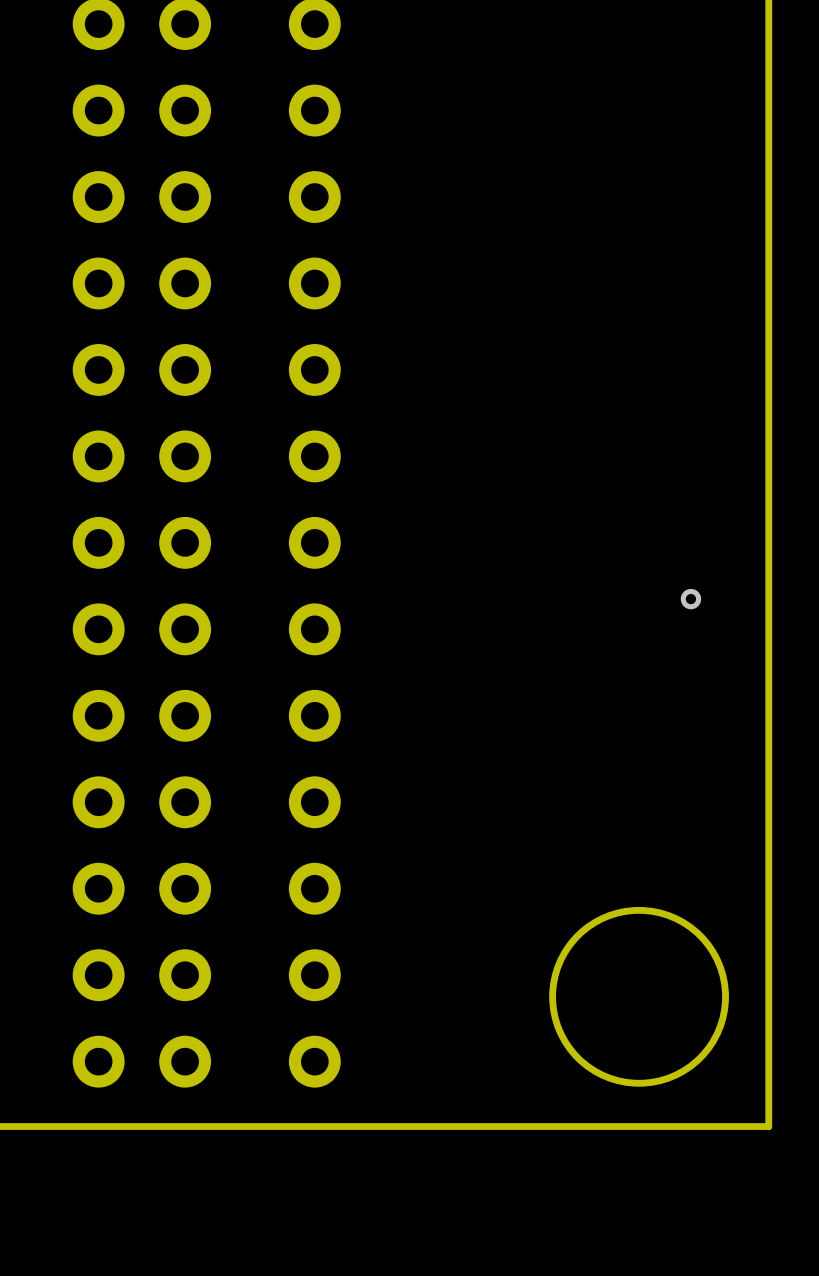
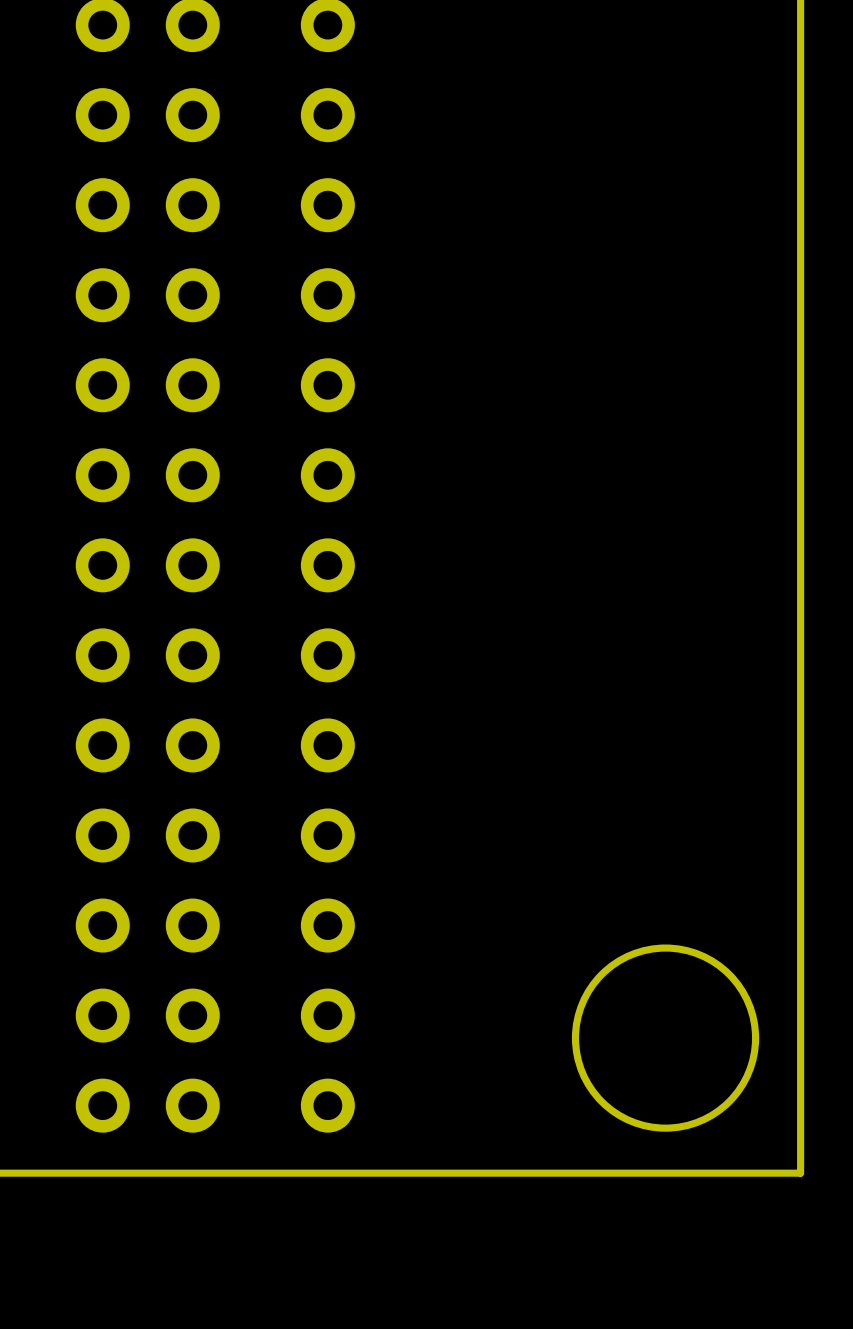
via: (690, 599) -> none

